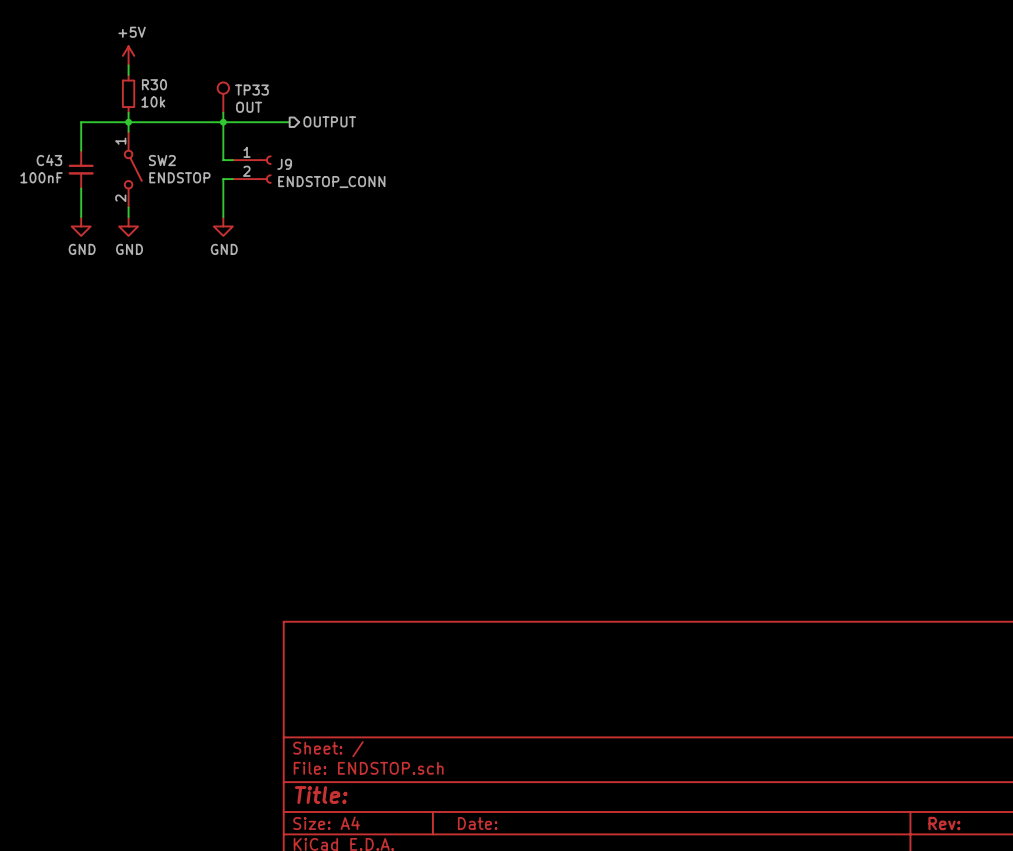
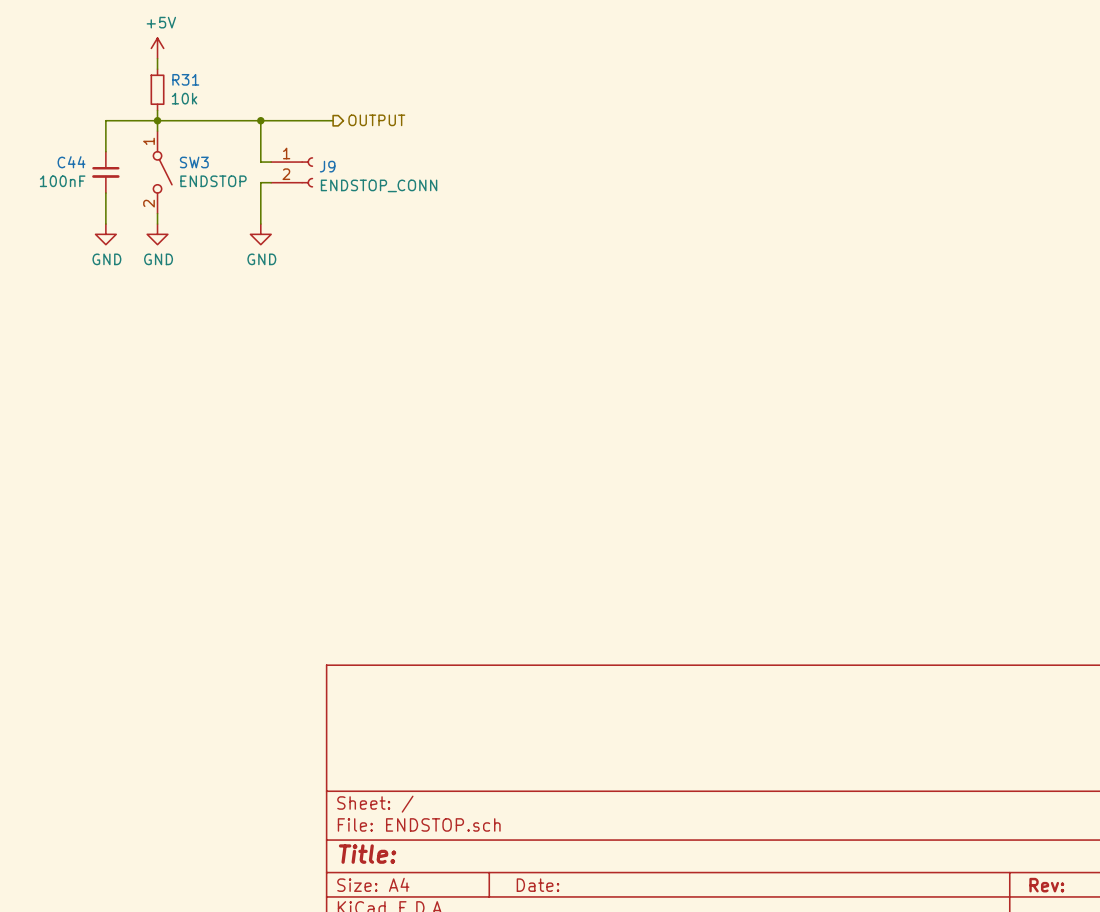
R30 name: R30 (154, 84) -> R31 (185, 79)
TP33: OUT (223, 97) -> none
wire: (223, 112) (223, 122) -> none
C43 name: C43 (49, 160) -> C44 (71, 162)
SW2 name: SW2 (162, 160) -> SW3 (194, 162)

